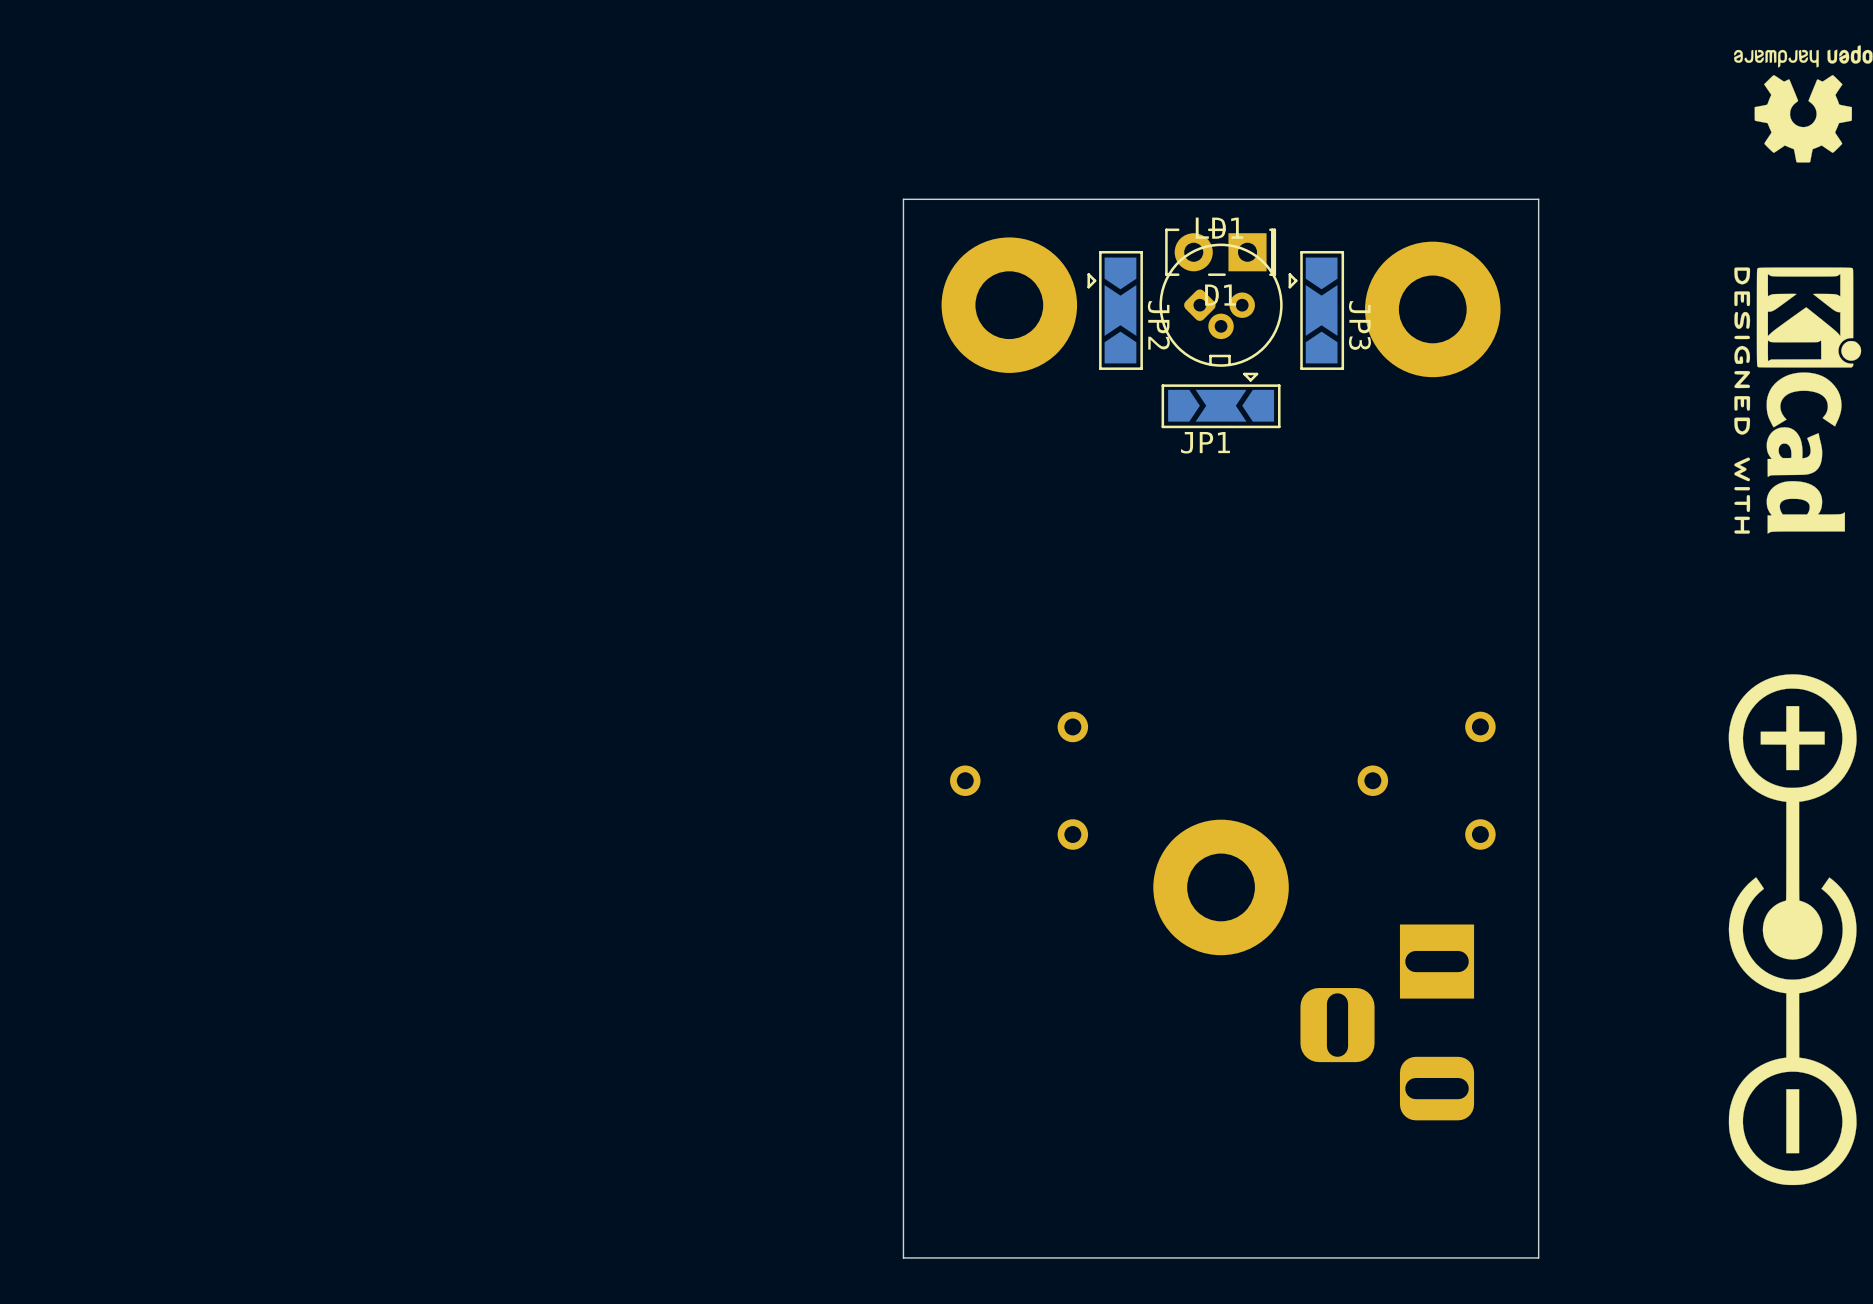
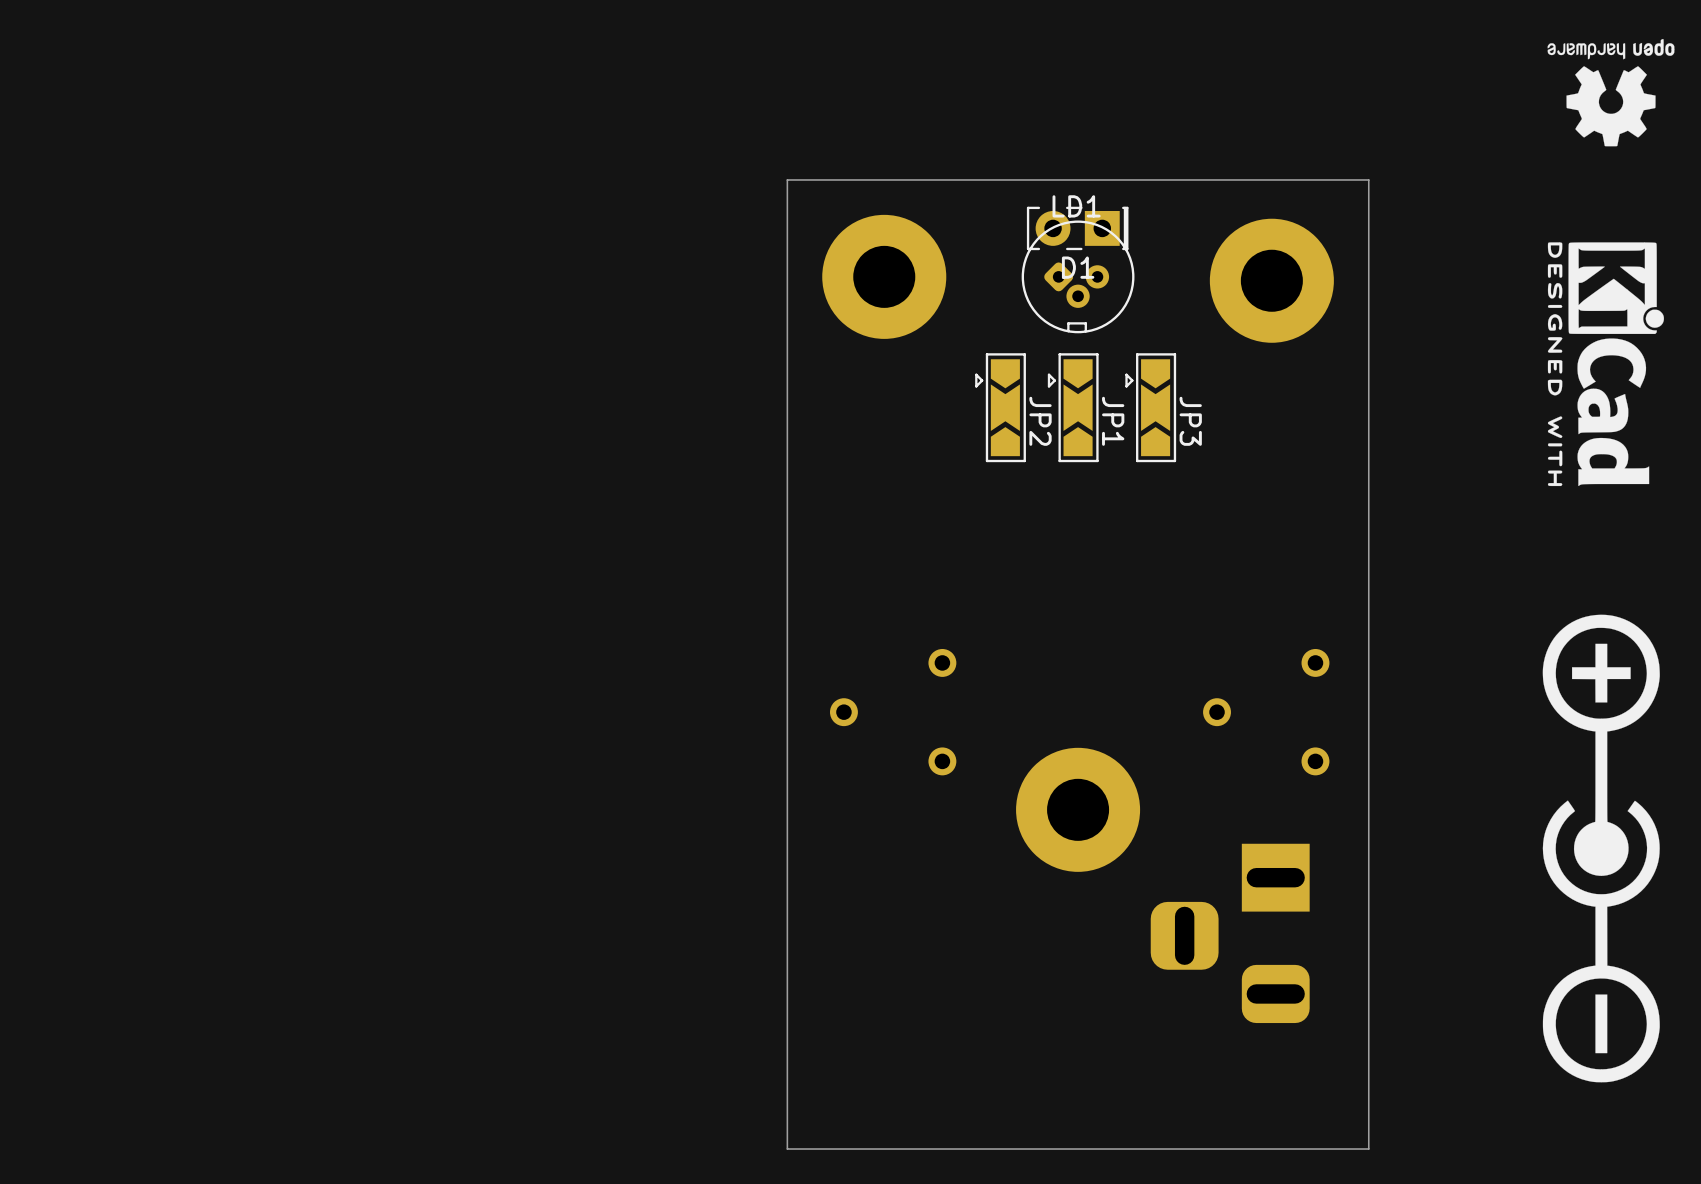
JP2 position: (1115, 310) -> (1000, 407)
JP3 position: (1316, 310) -> (1150, 407)
JP1 rotation: 0° (1221, 400) -> 90° counterclockwise (1073, 407)

